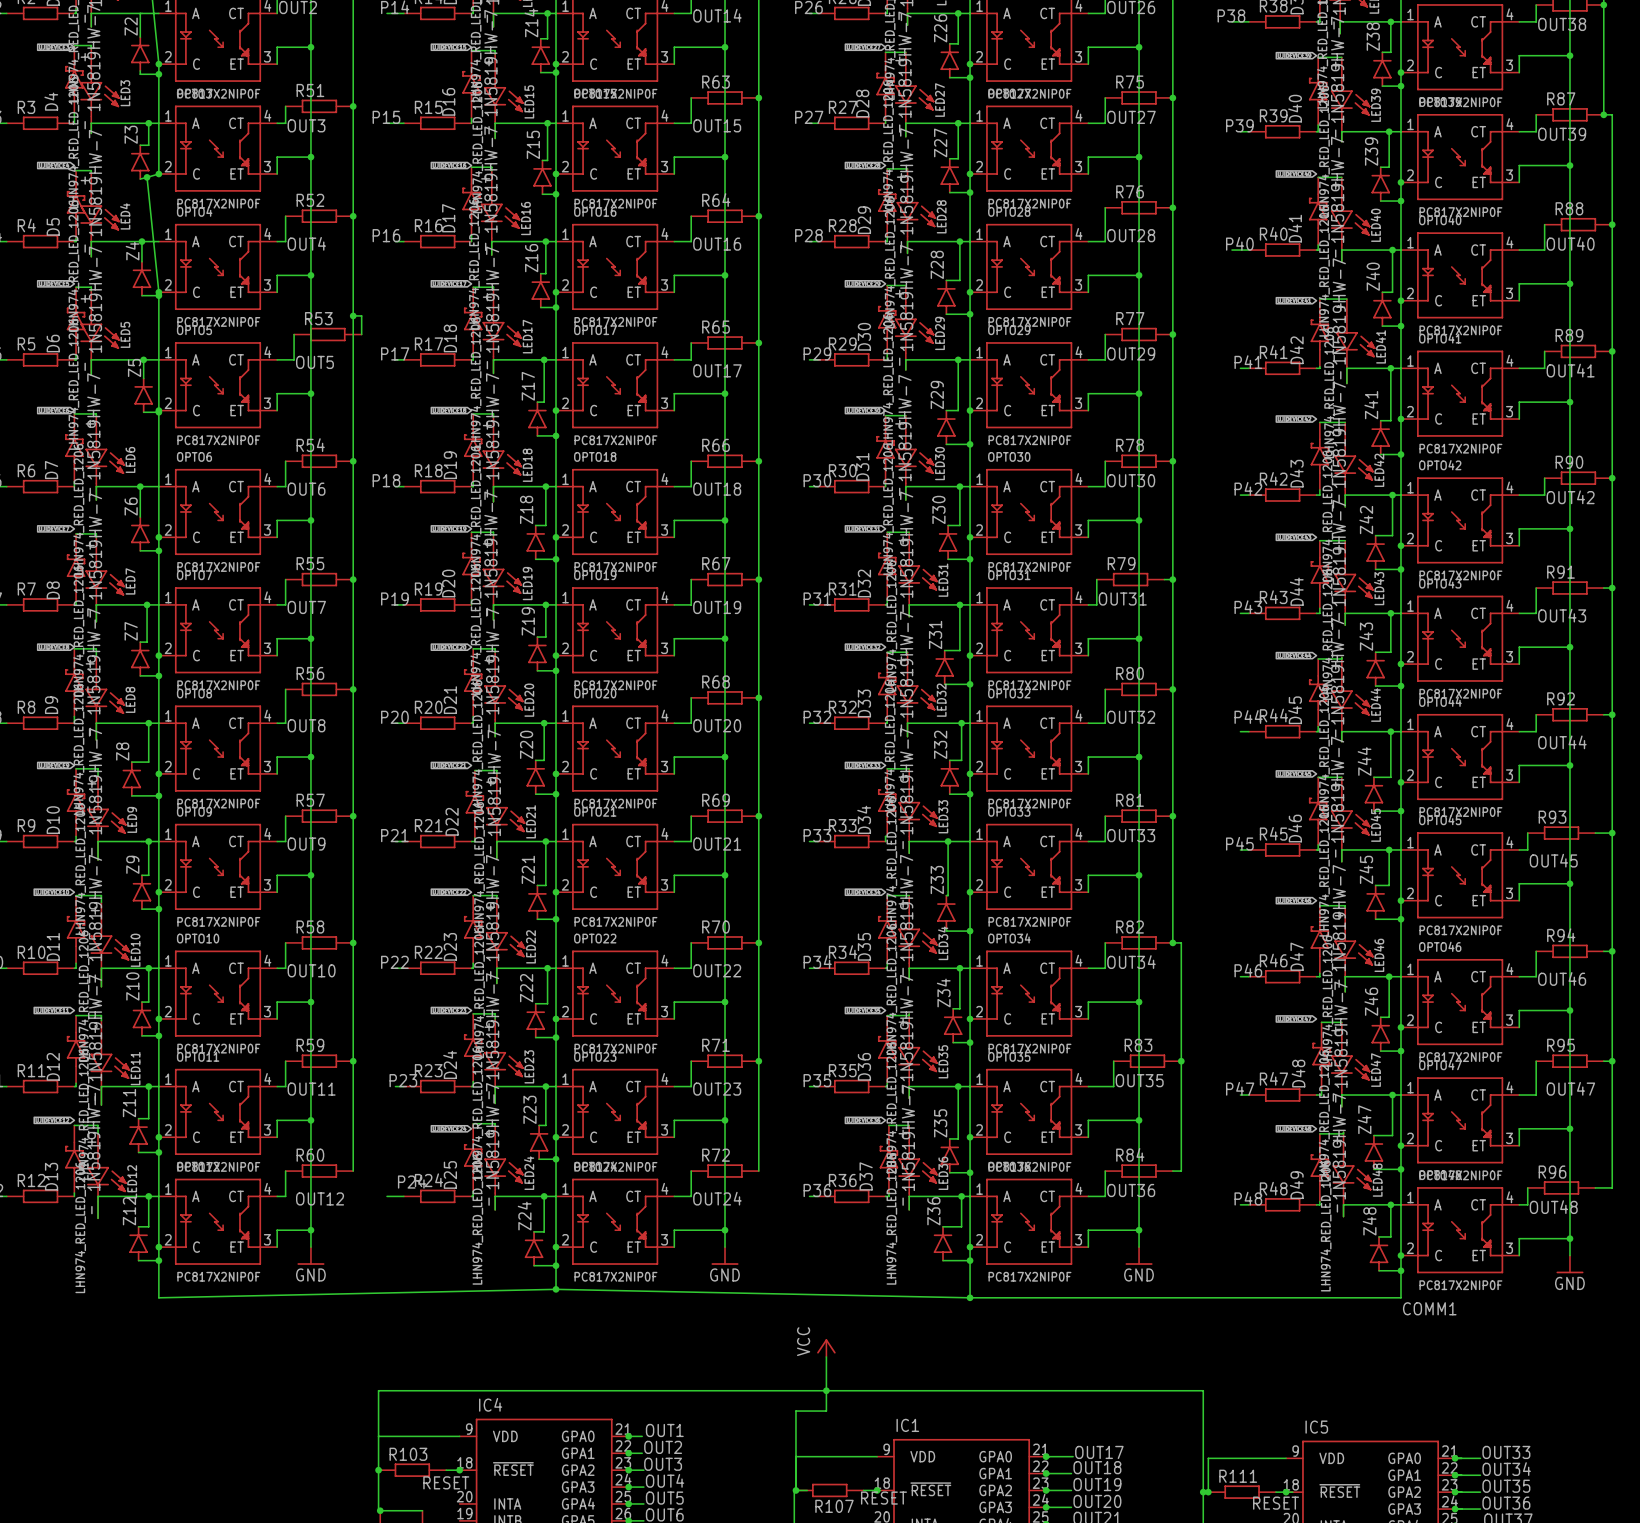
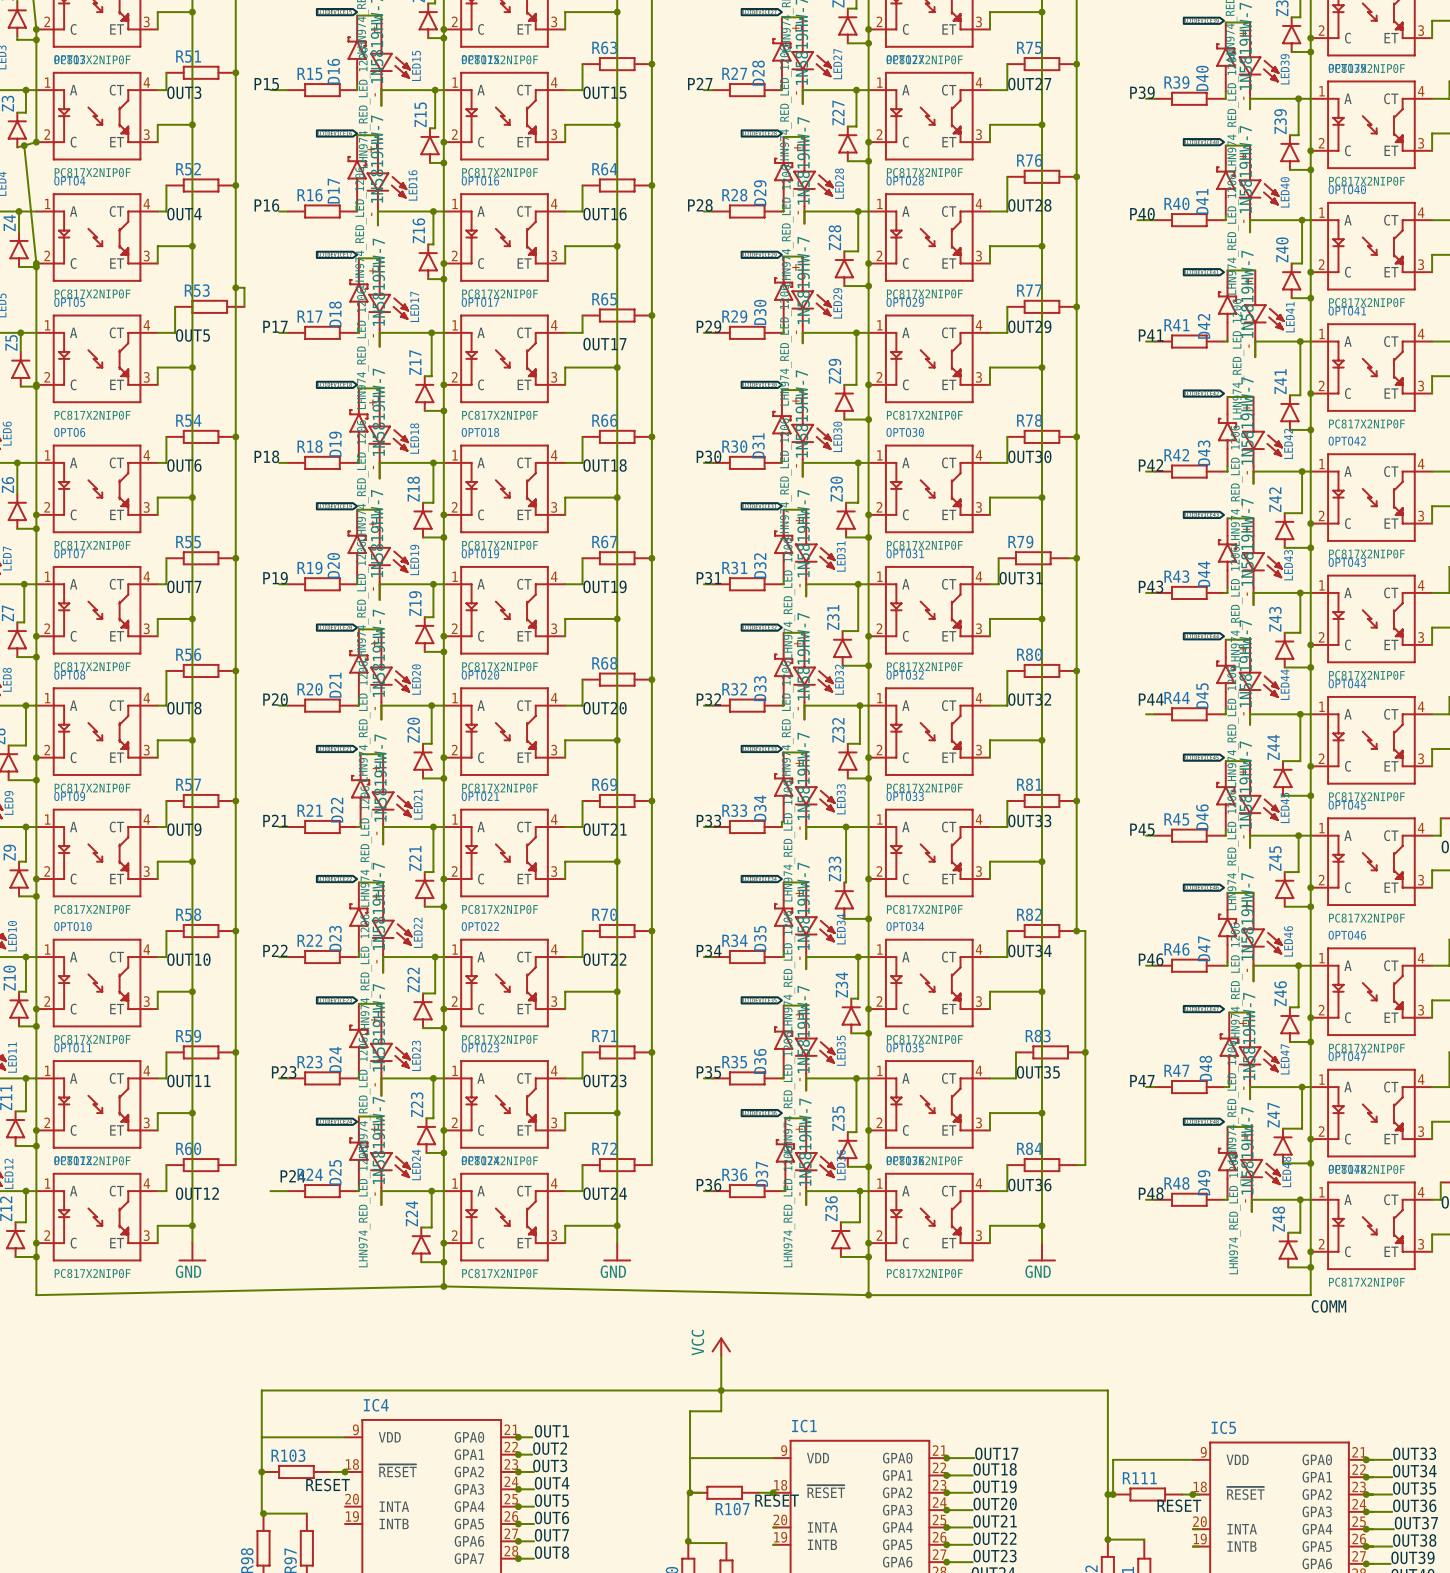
label: COMM1 (1429, 1308) -> COMM (1328, 1306)

